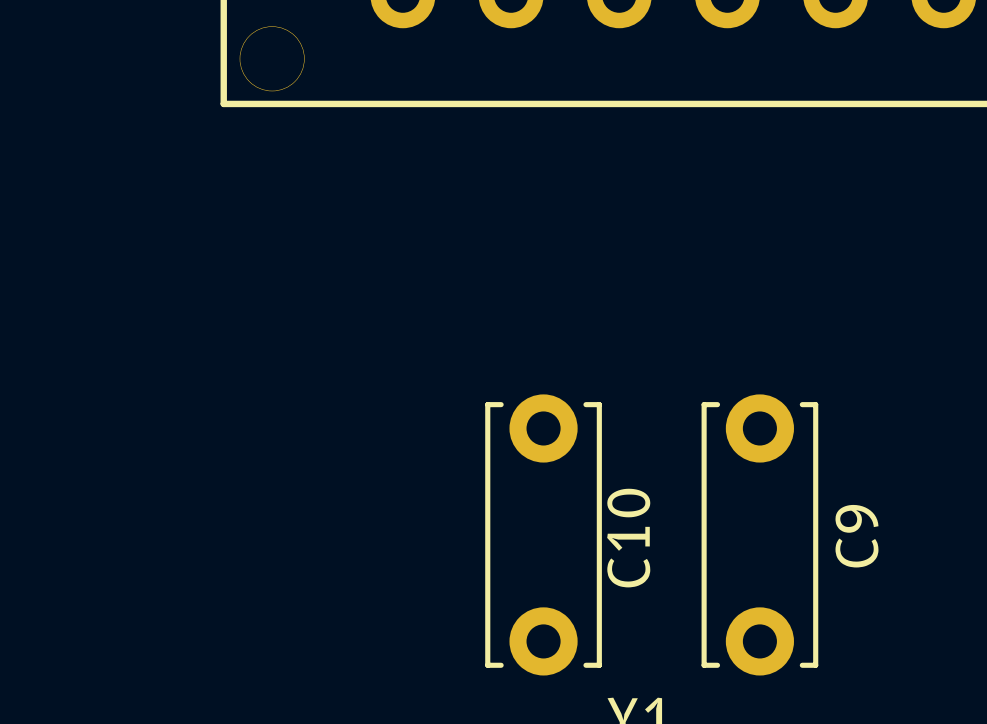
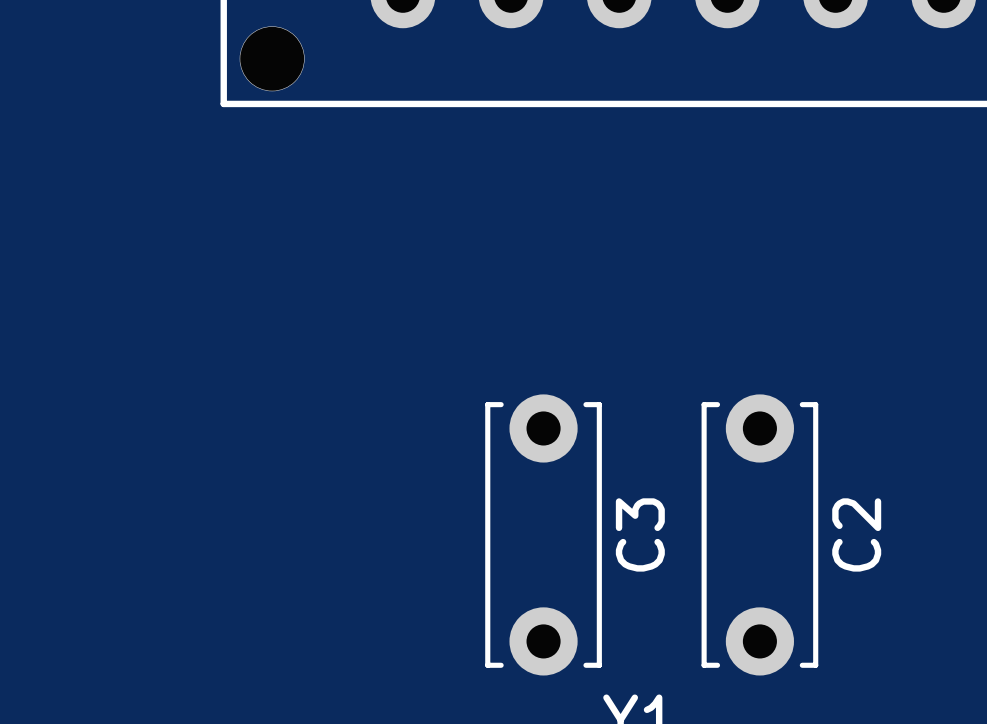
C9 name: C9 (856, 536) -> C2 (856, 534)
C10 name: C10 (628, 538) -> C3 (640, 534)

